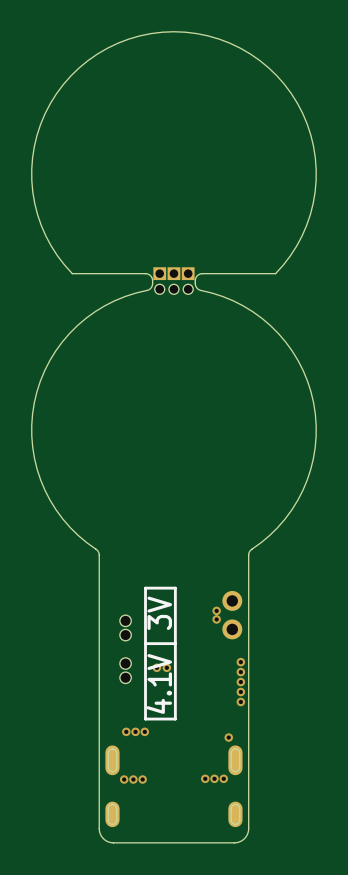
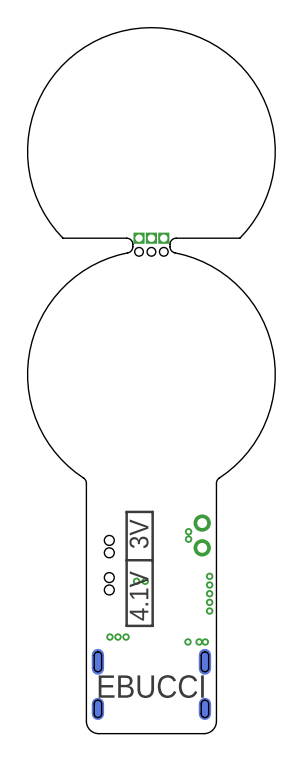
via: none -> (187, 641)
via: none -> (205, 641)
via: (205, 778) -> none
via: (214, 778) -> none
via: (223, 778) -> none
via: (124, 779) -> none
via: (133, 779) -> none
via: (142, 779) -> none
text: none -> EBUCCI (151, 686)

